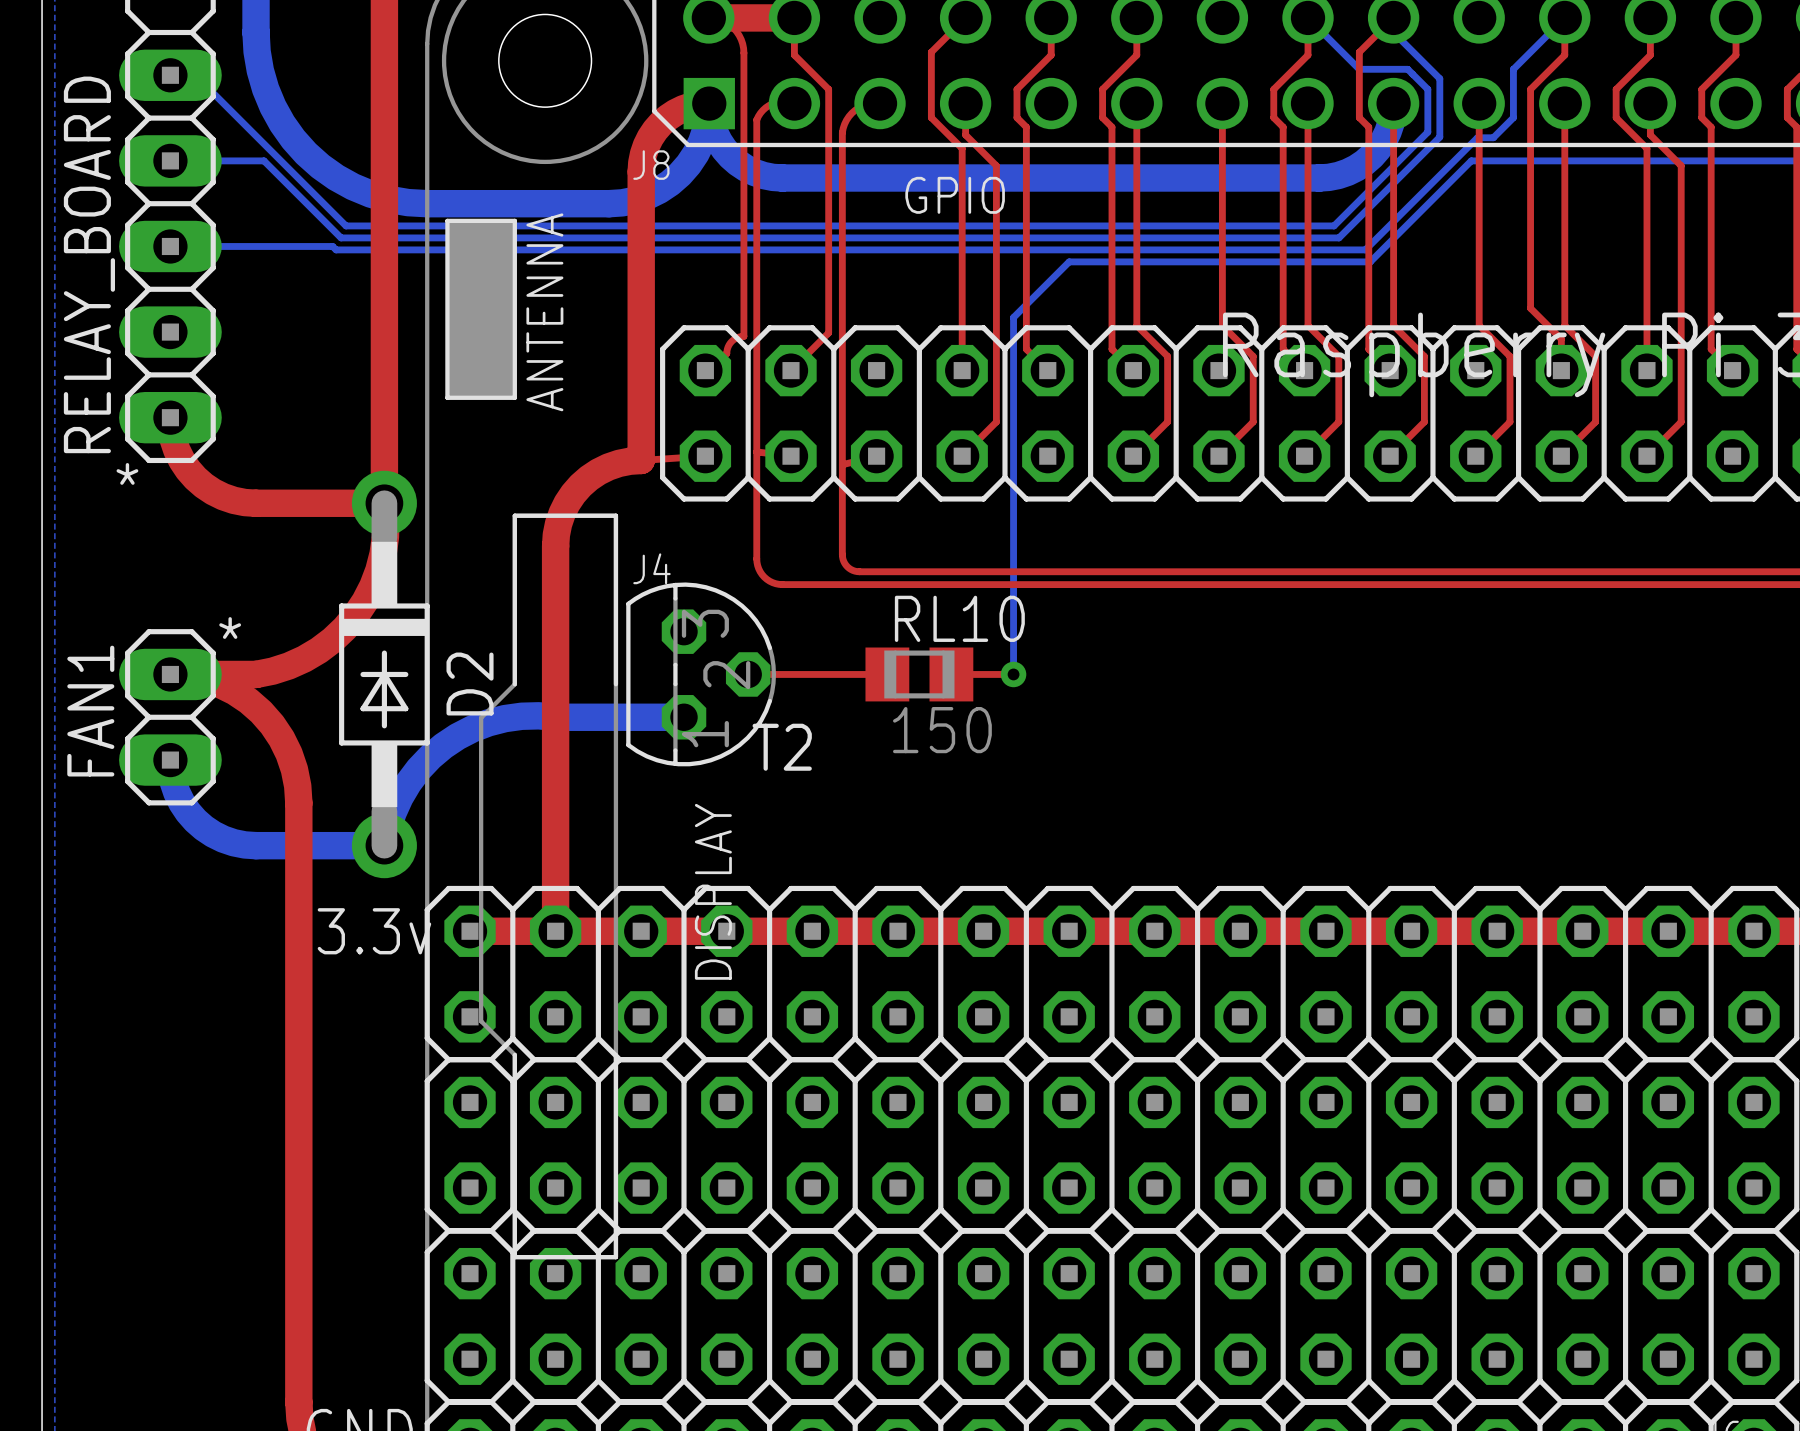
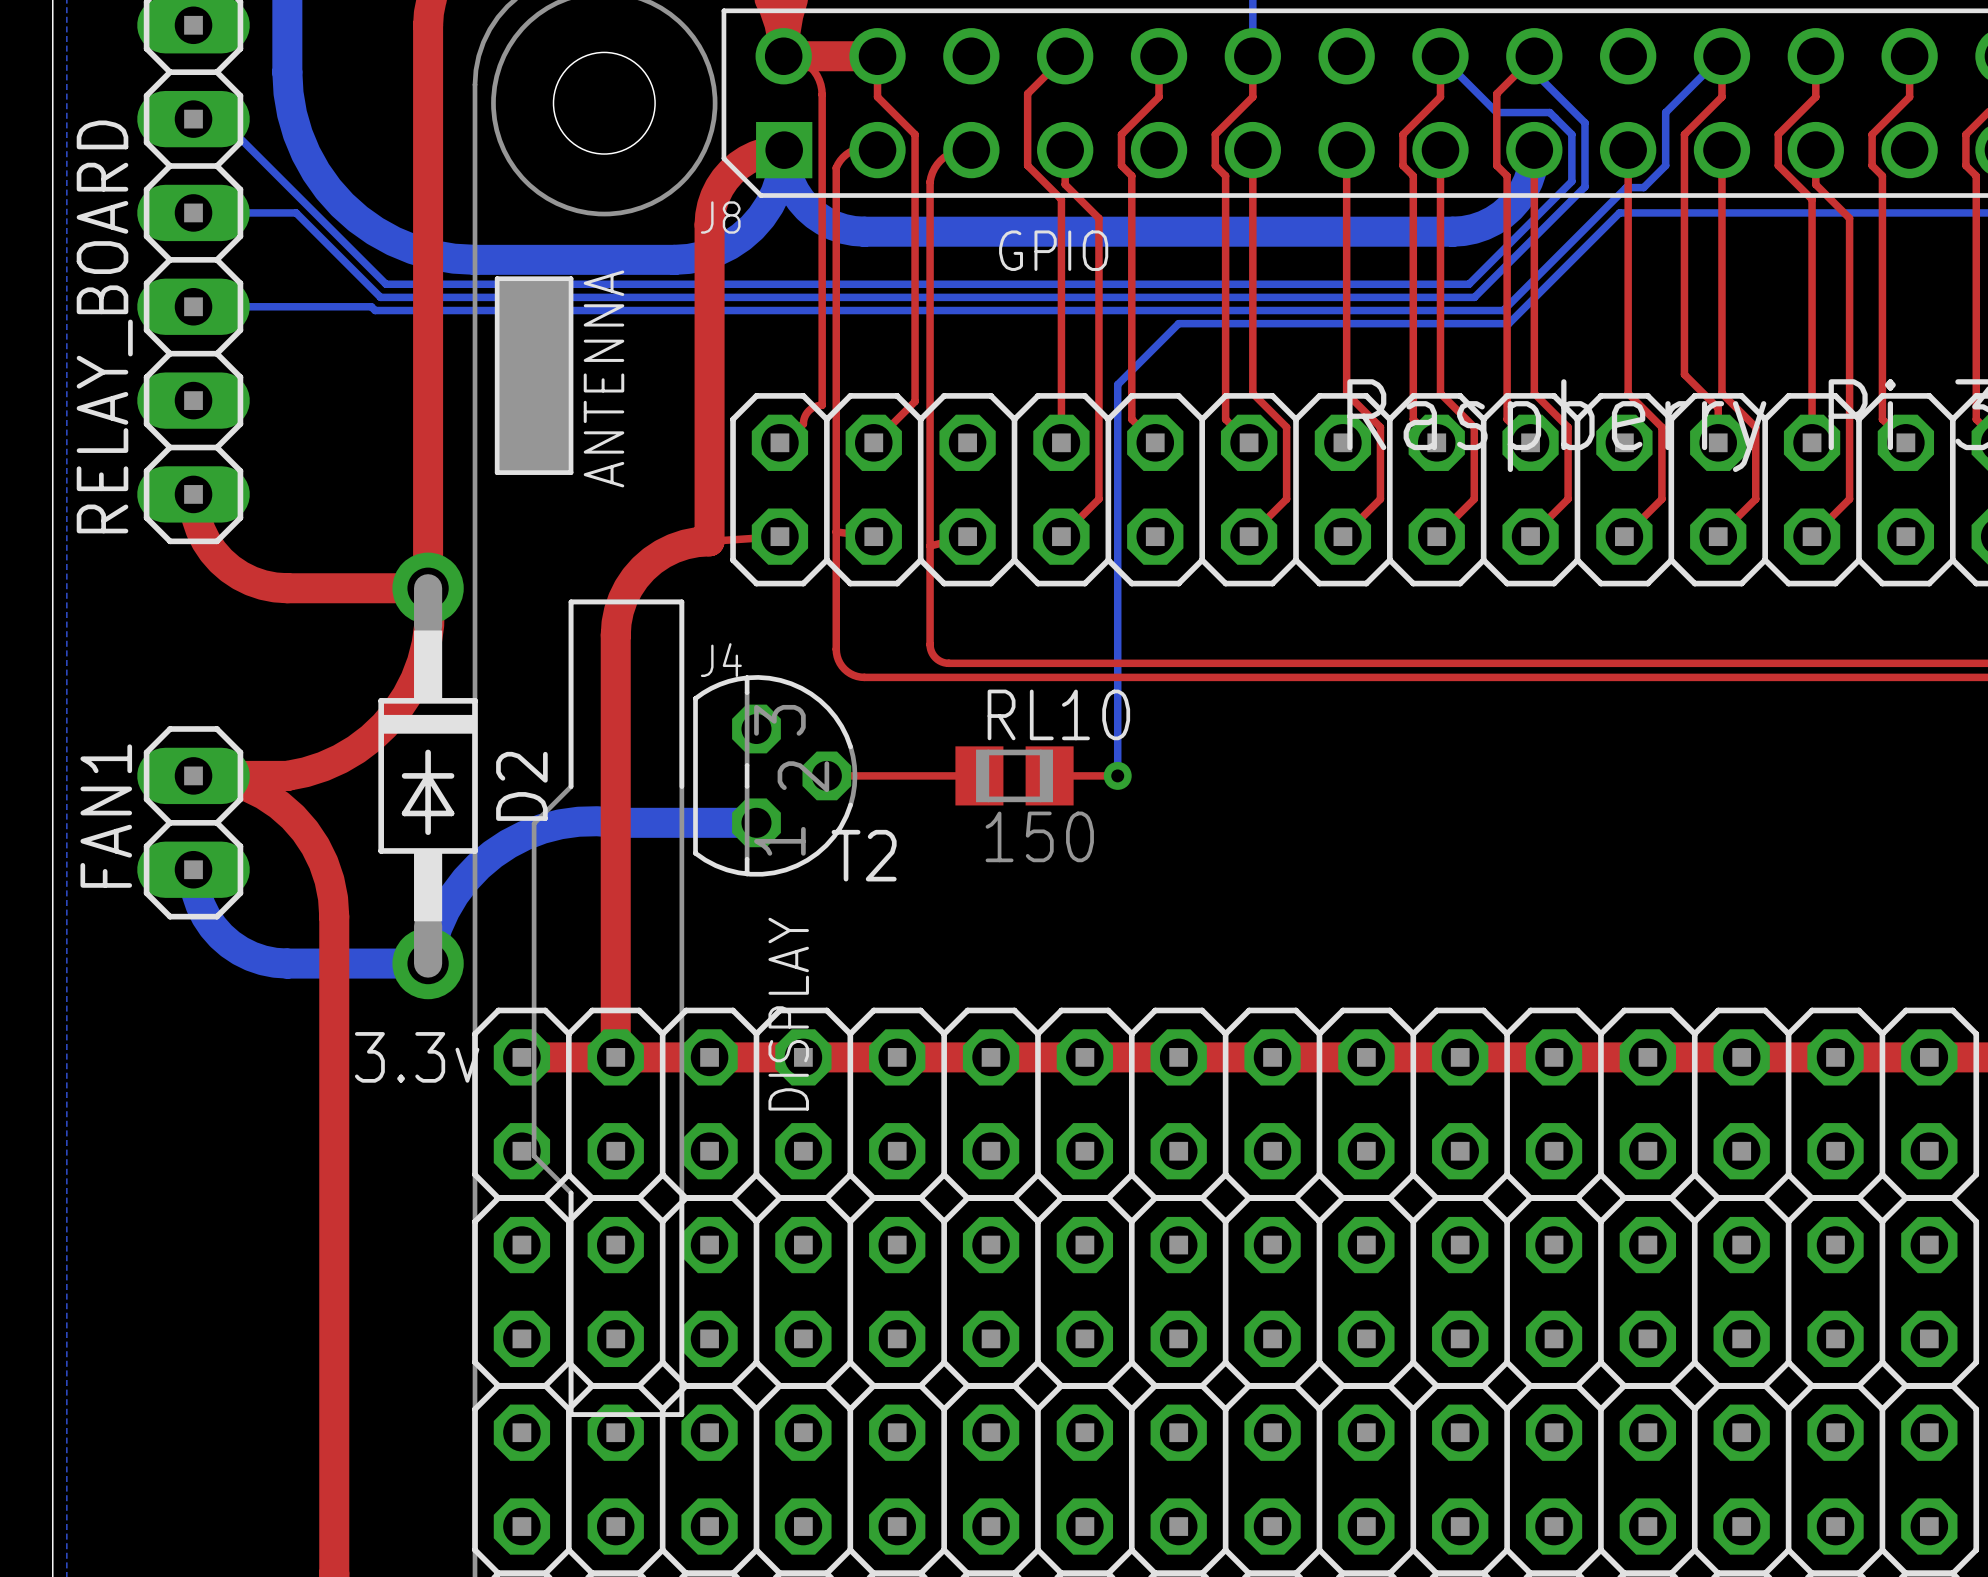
text: * (127, 473) -> none
text: * (230, 628) -> none

